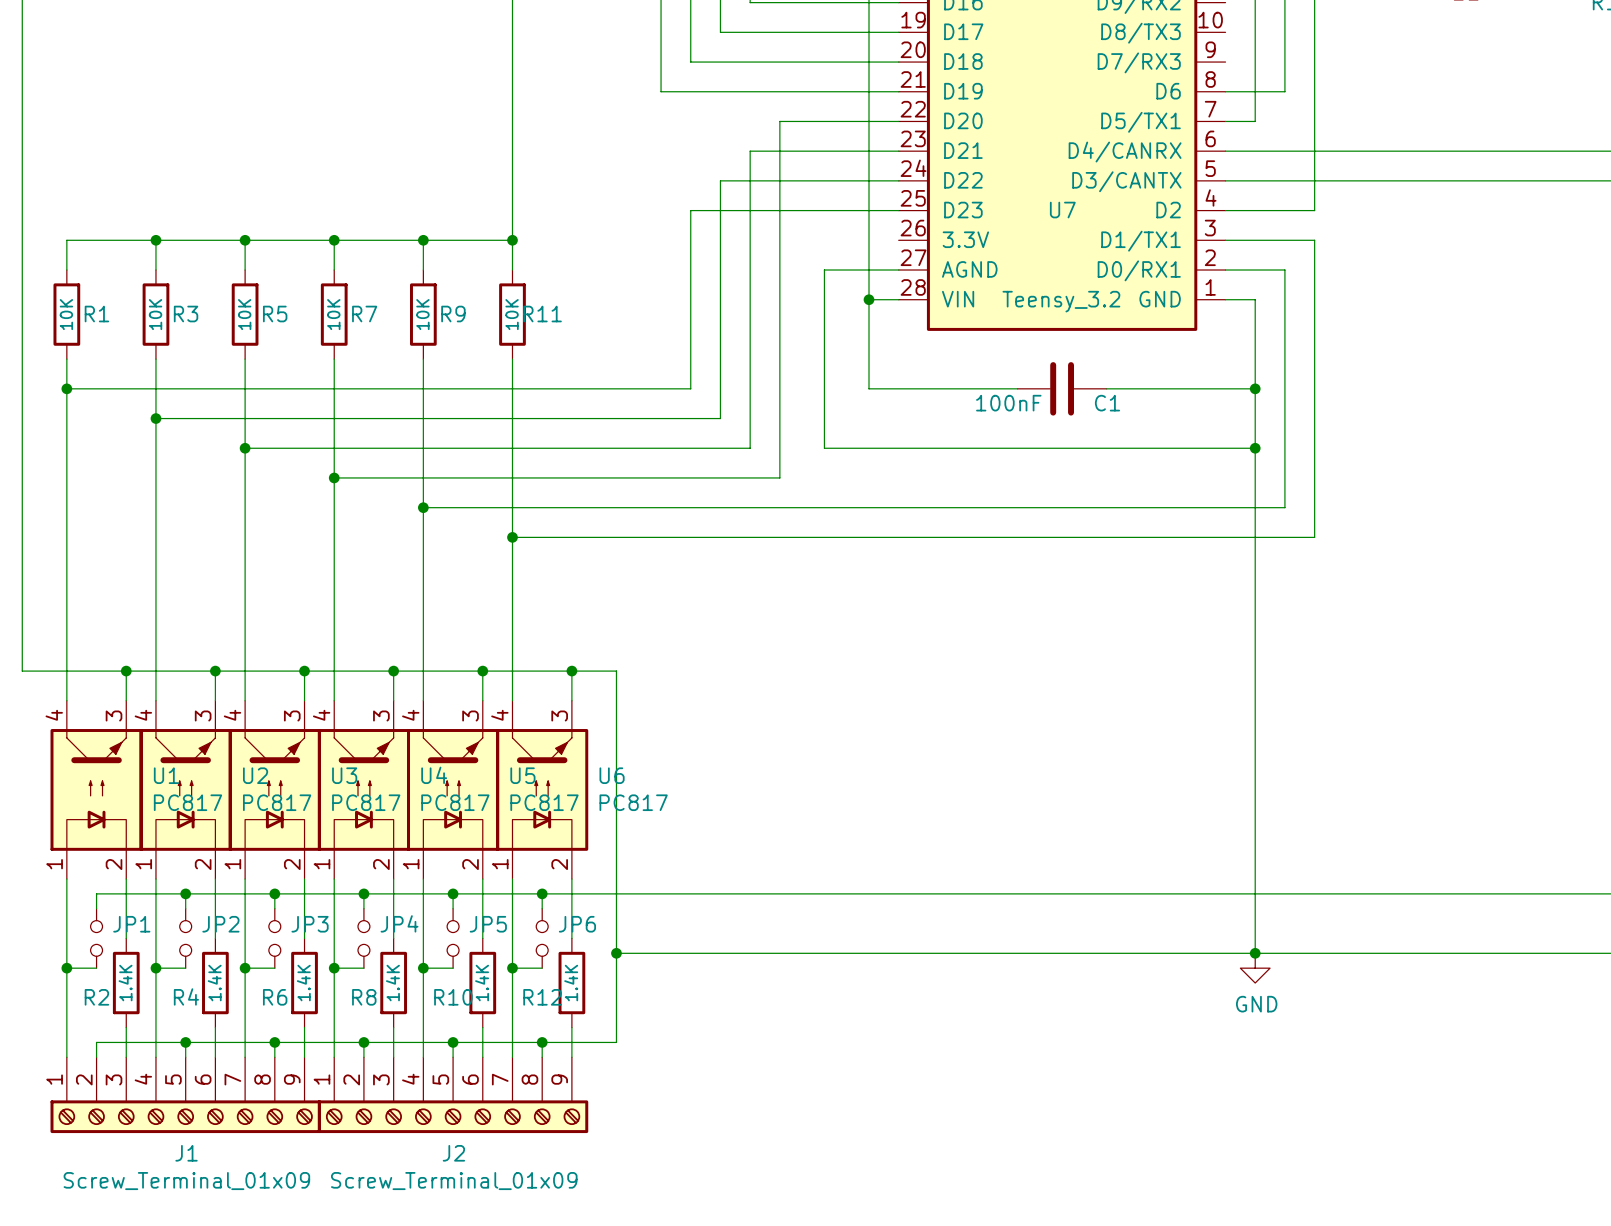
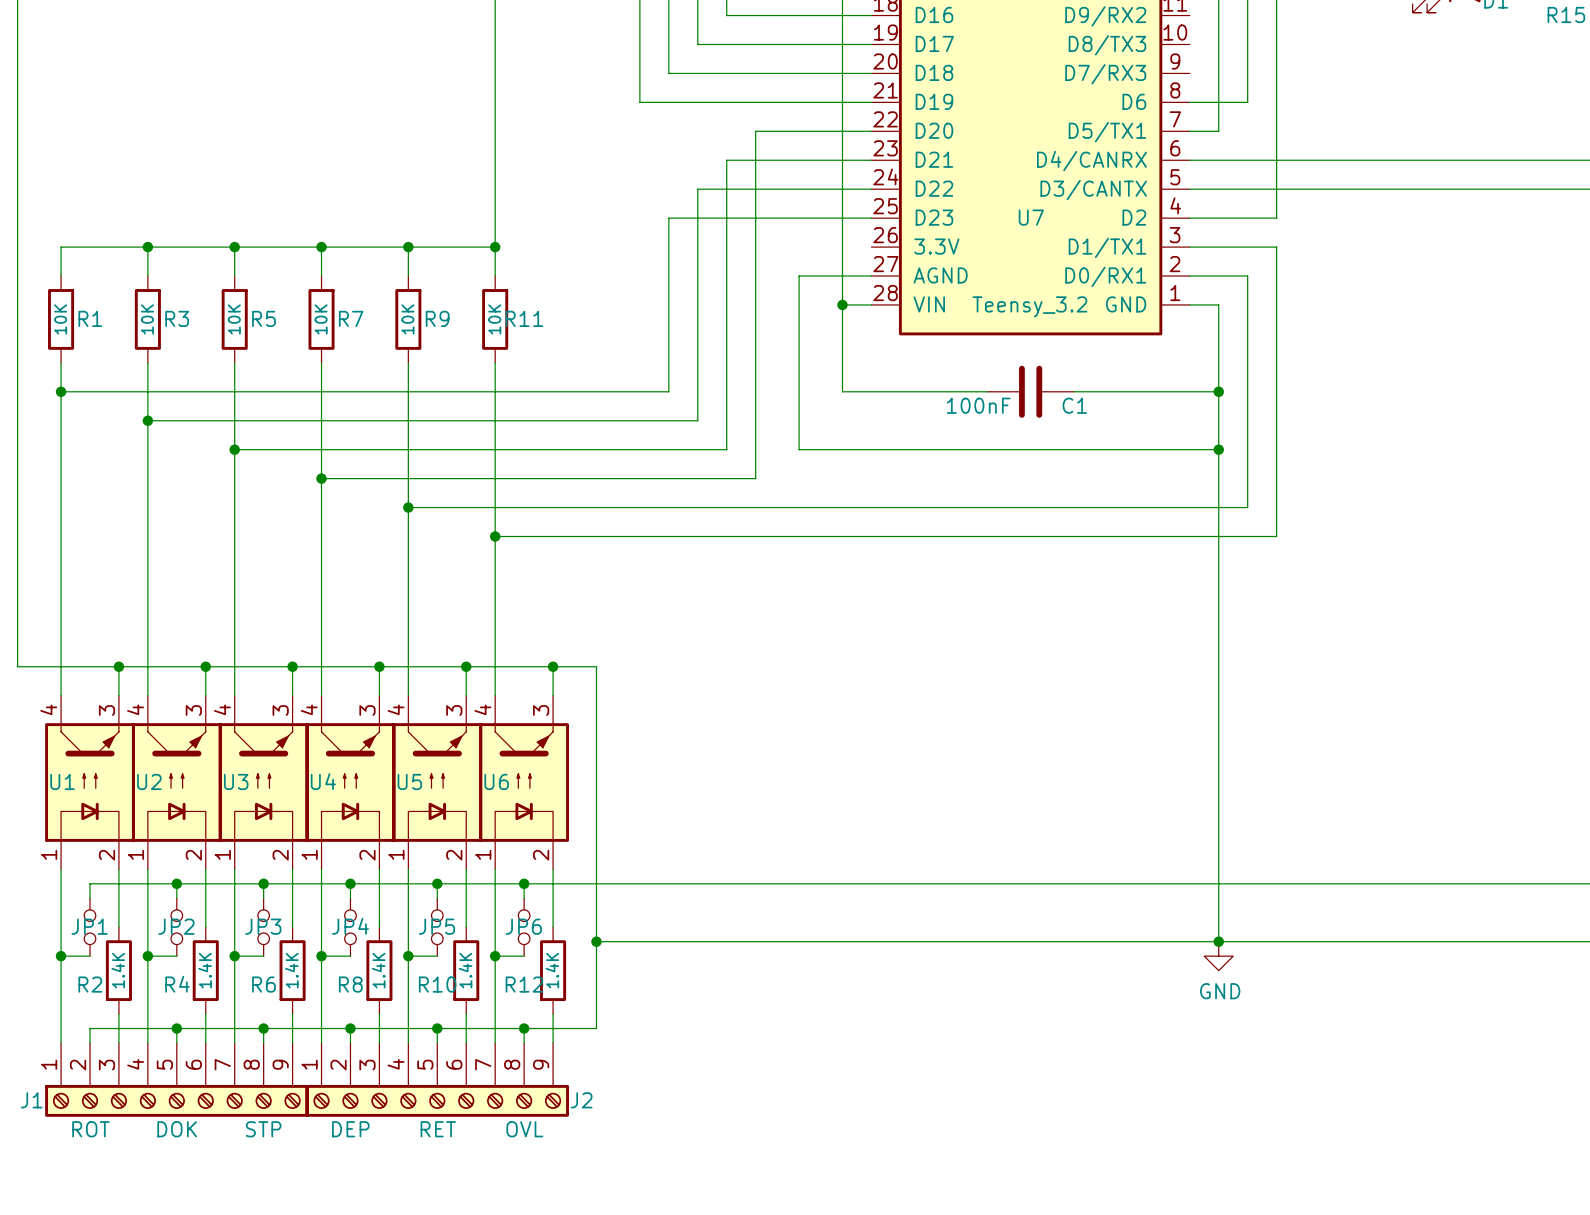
U1 name position: U1 (166, 775) -> U1 (62, 781)
U2 name position: U2 (255, 775) -> U2 (149, 781)
U3 name position: U3 (344, 775) -> U3 (236, 781)
U4 name position: U4 (434, 775) -> U4 (323, 781)
U5 name position: U5 (522, 775) -> U5 (409, 781)
U6 name position: U6 (612, 775) -> U6 (496, 781)
U1 value: PC817 (187, 802) -> ROT (91, 1129)
U2 value: PC817 (277, 802) -> DOK (177, 1129)
U3 value: PC817 (366, 802) -> STP (263, 1129)
U4 value: PC817 (455, 802) -> DEP (350, 1129)
U5 value: PC817 (544, 802) -> RET (438, 1129)
U6 value: PC817 (633, 802) -> OVL (524, 1129)
JP4 name position: JP4 (399, 923) -> JP4 (350, 926)
JP1 name position: JP1 (131, 924) -> JP1 (89, 926)
JP2 name position: JP2 (220, 924) -> JP2 (176, 926)
JP3 name position: JP3 (310, 924) -> JP3 (263, 926)
JP5 name position: JP5 (488, 924) -> JP5 (436, 926)
JP6 name position: JP6 (577, 924) -> JP6 (523, 926)
J1 name position: J1 (186, 1153) -> J1 (31, 1100)
J2 name position: J2 (453, 1153) -> J2 (581, 1100)
J1 value: Screw_Terminal_01x09 (186, 1181) -> none
J2 value: Screw_Terminal_01x09 (454, 1181) -> none

